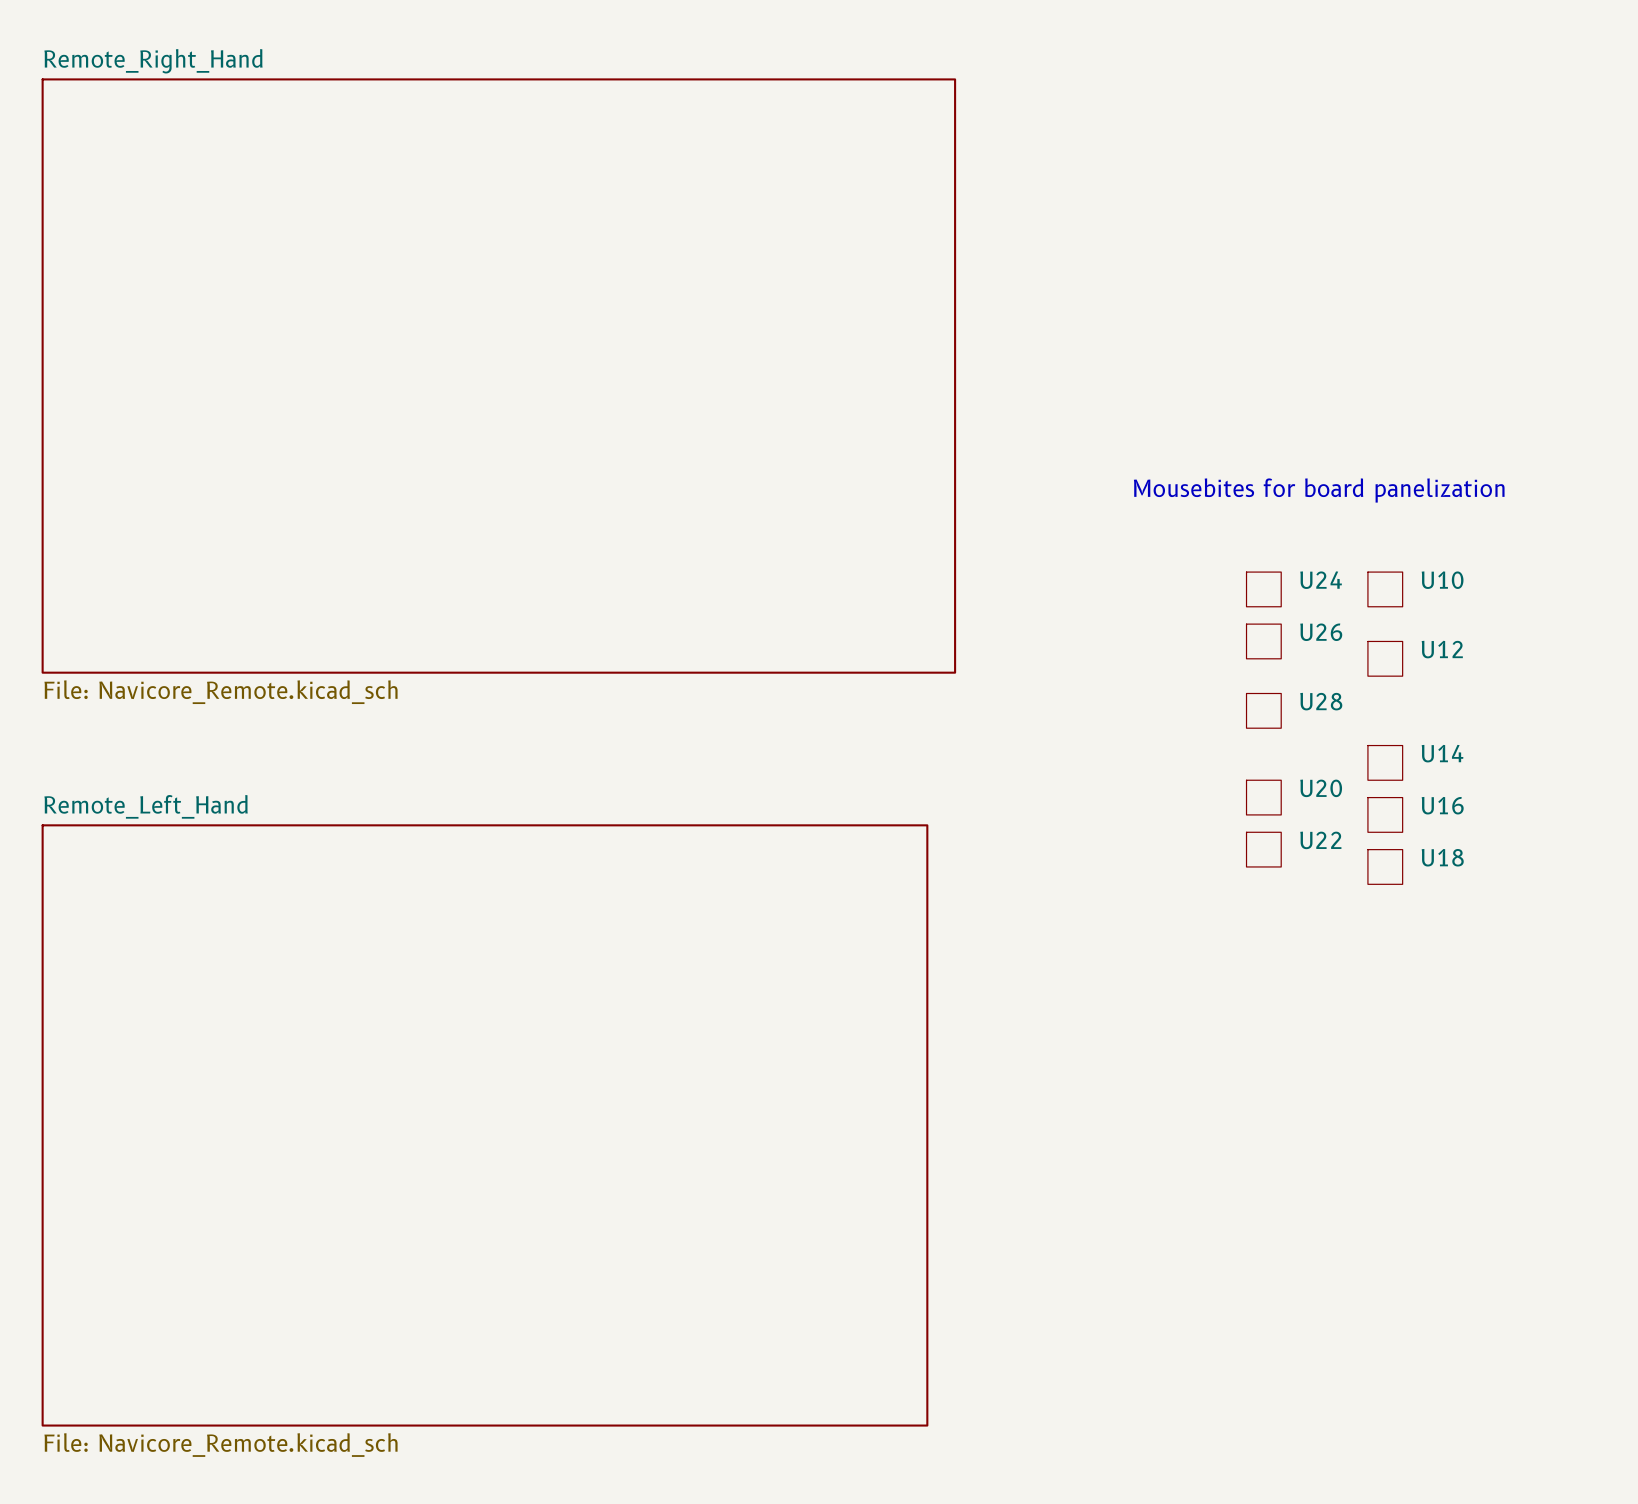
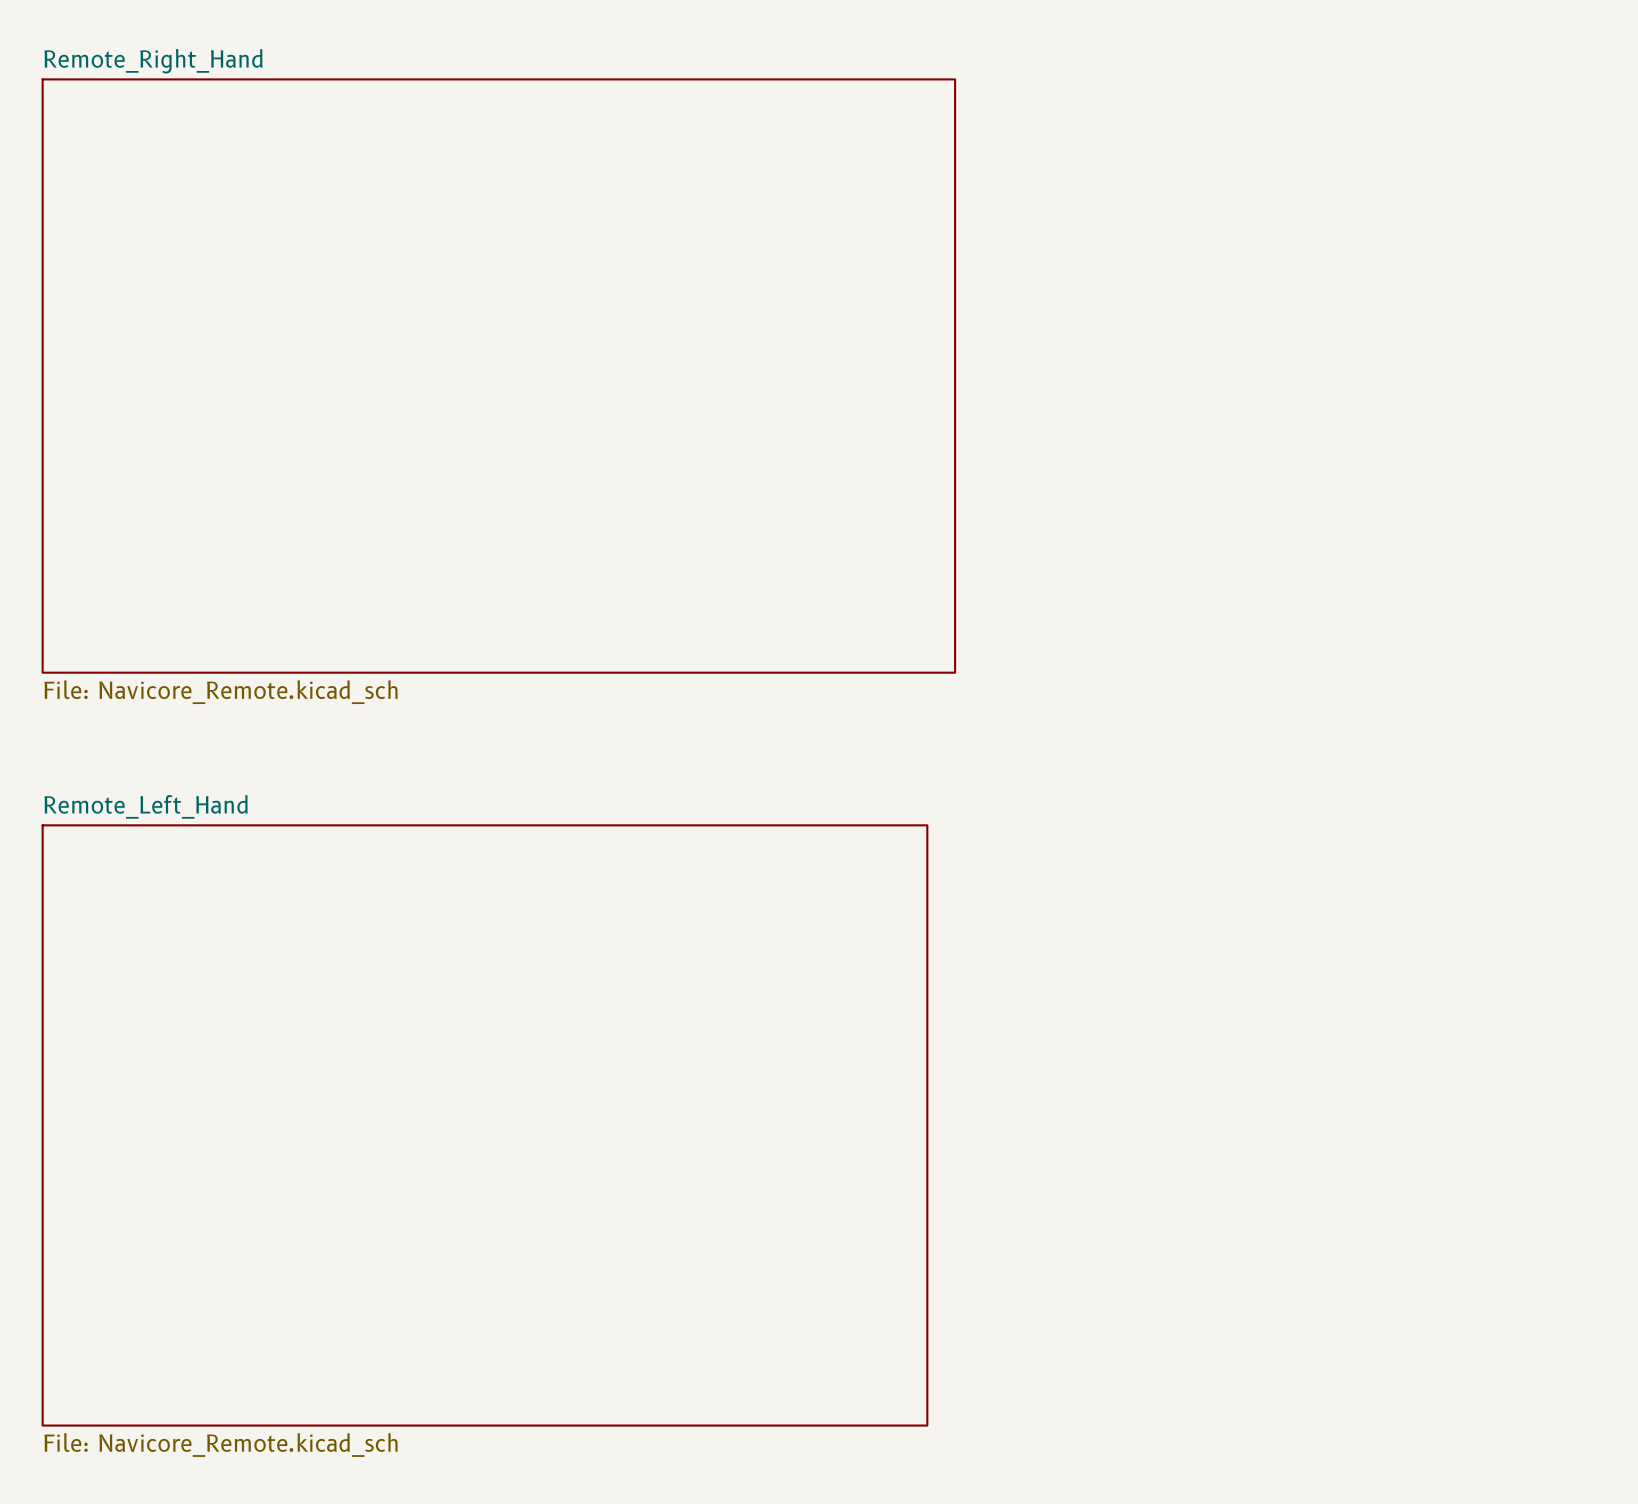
text: Mousebites for board panelization (1319, 490) -> none
U24: (1263, 589) -> none
U10: (1385, 589) -> none
U26: (1263, 641) -> none
U12: (1385, 658) -> none
U28: (1263, 710) -> none
U14: (1385, 762) -> none
U20: (1263, 797) -> none
U16: (1385, 814) -> none
U22: (1263, 849) -> none
U18: (1385, 866) -> none

